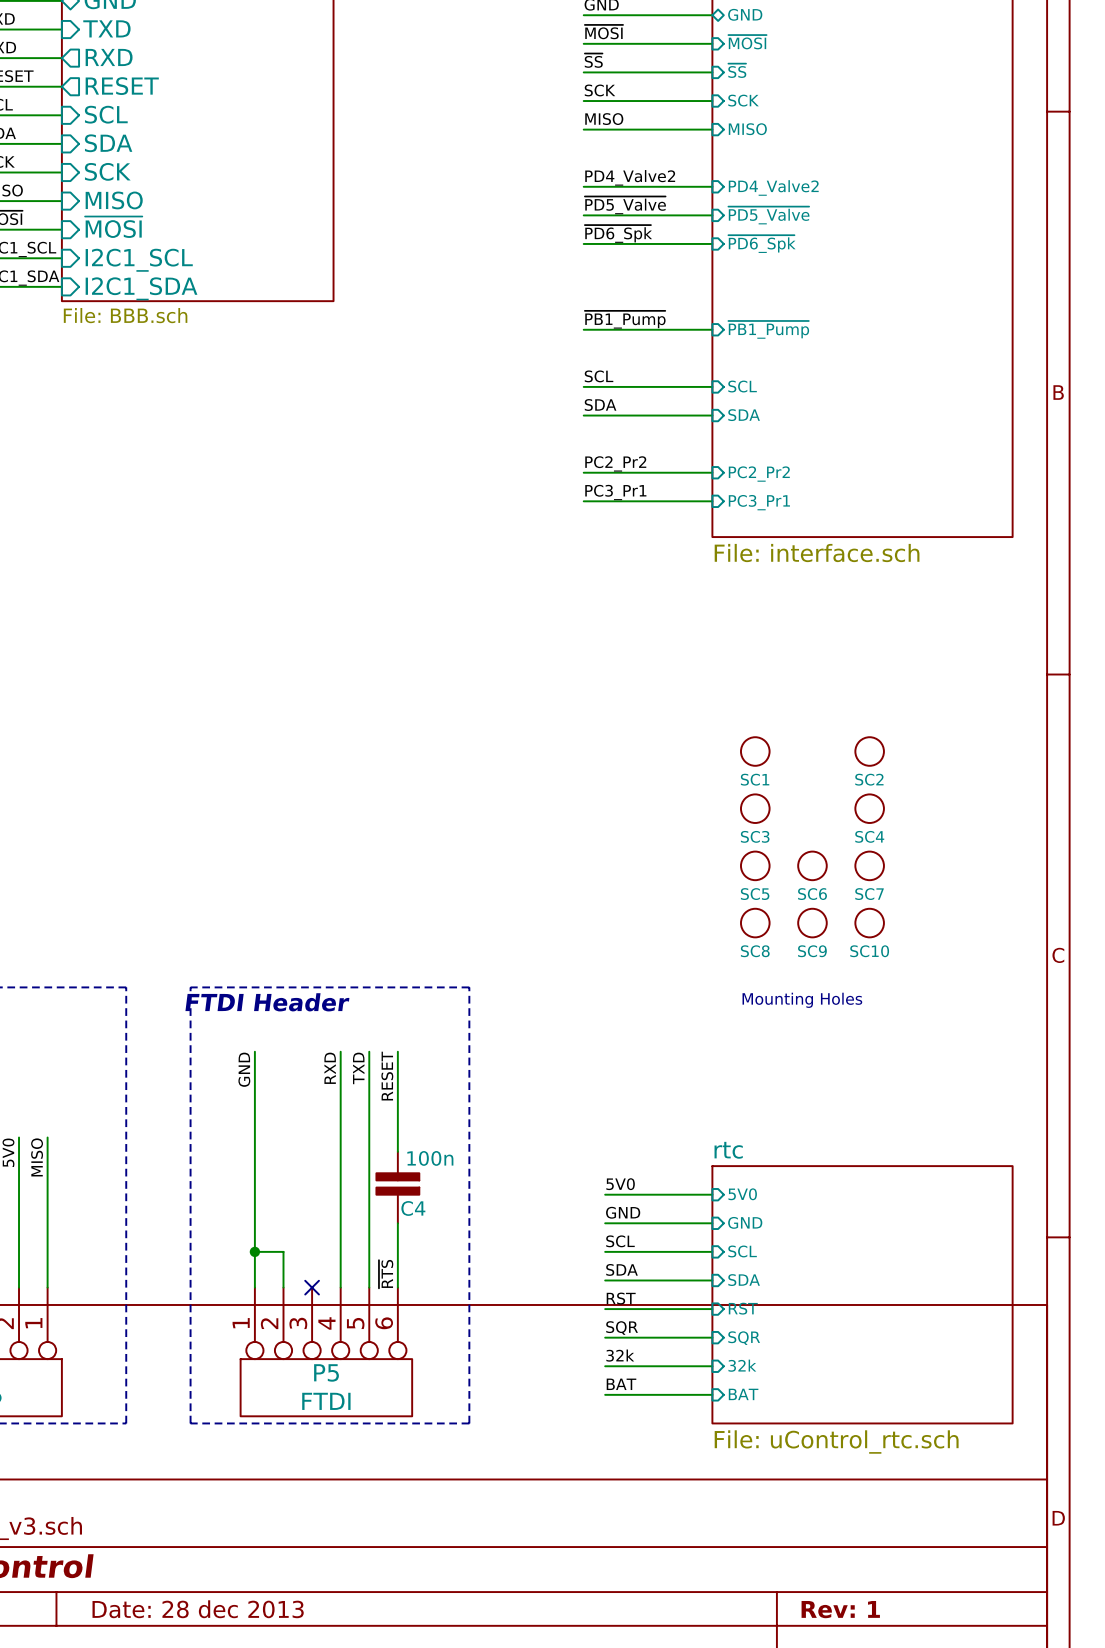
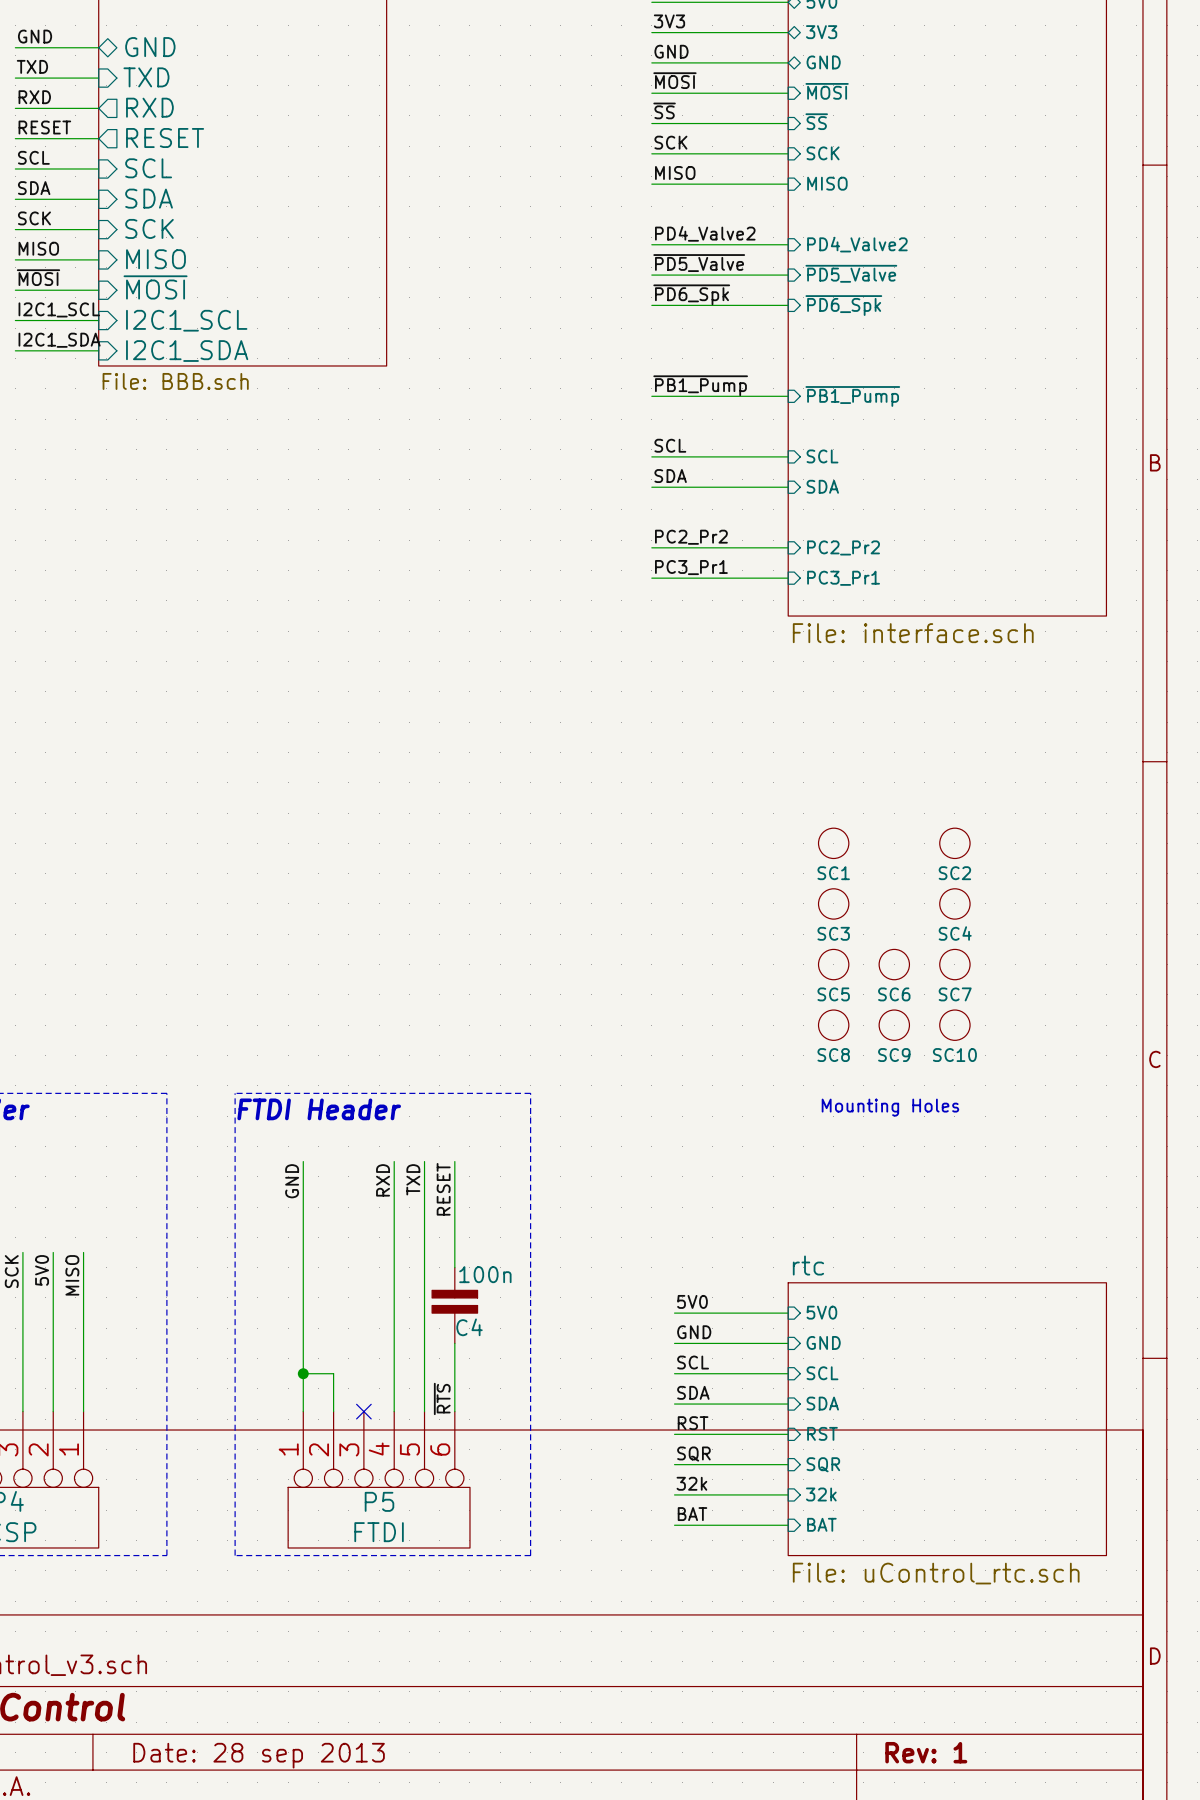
title block: Date: 28 dec 2013 (198, 1609) -> Date: 28 sep 2013 (259, 1755)

